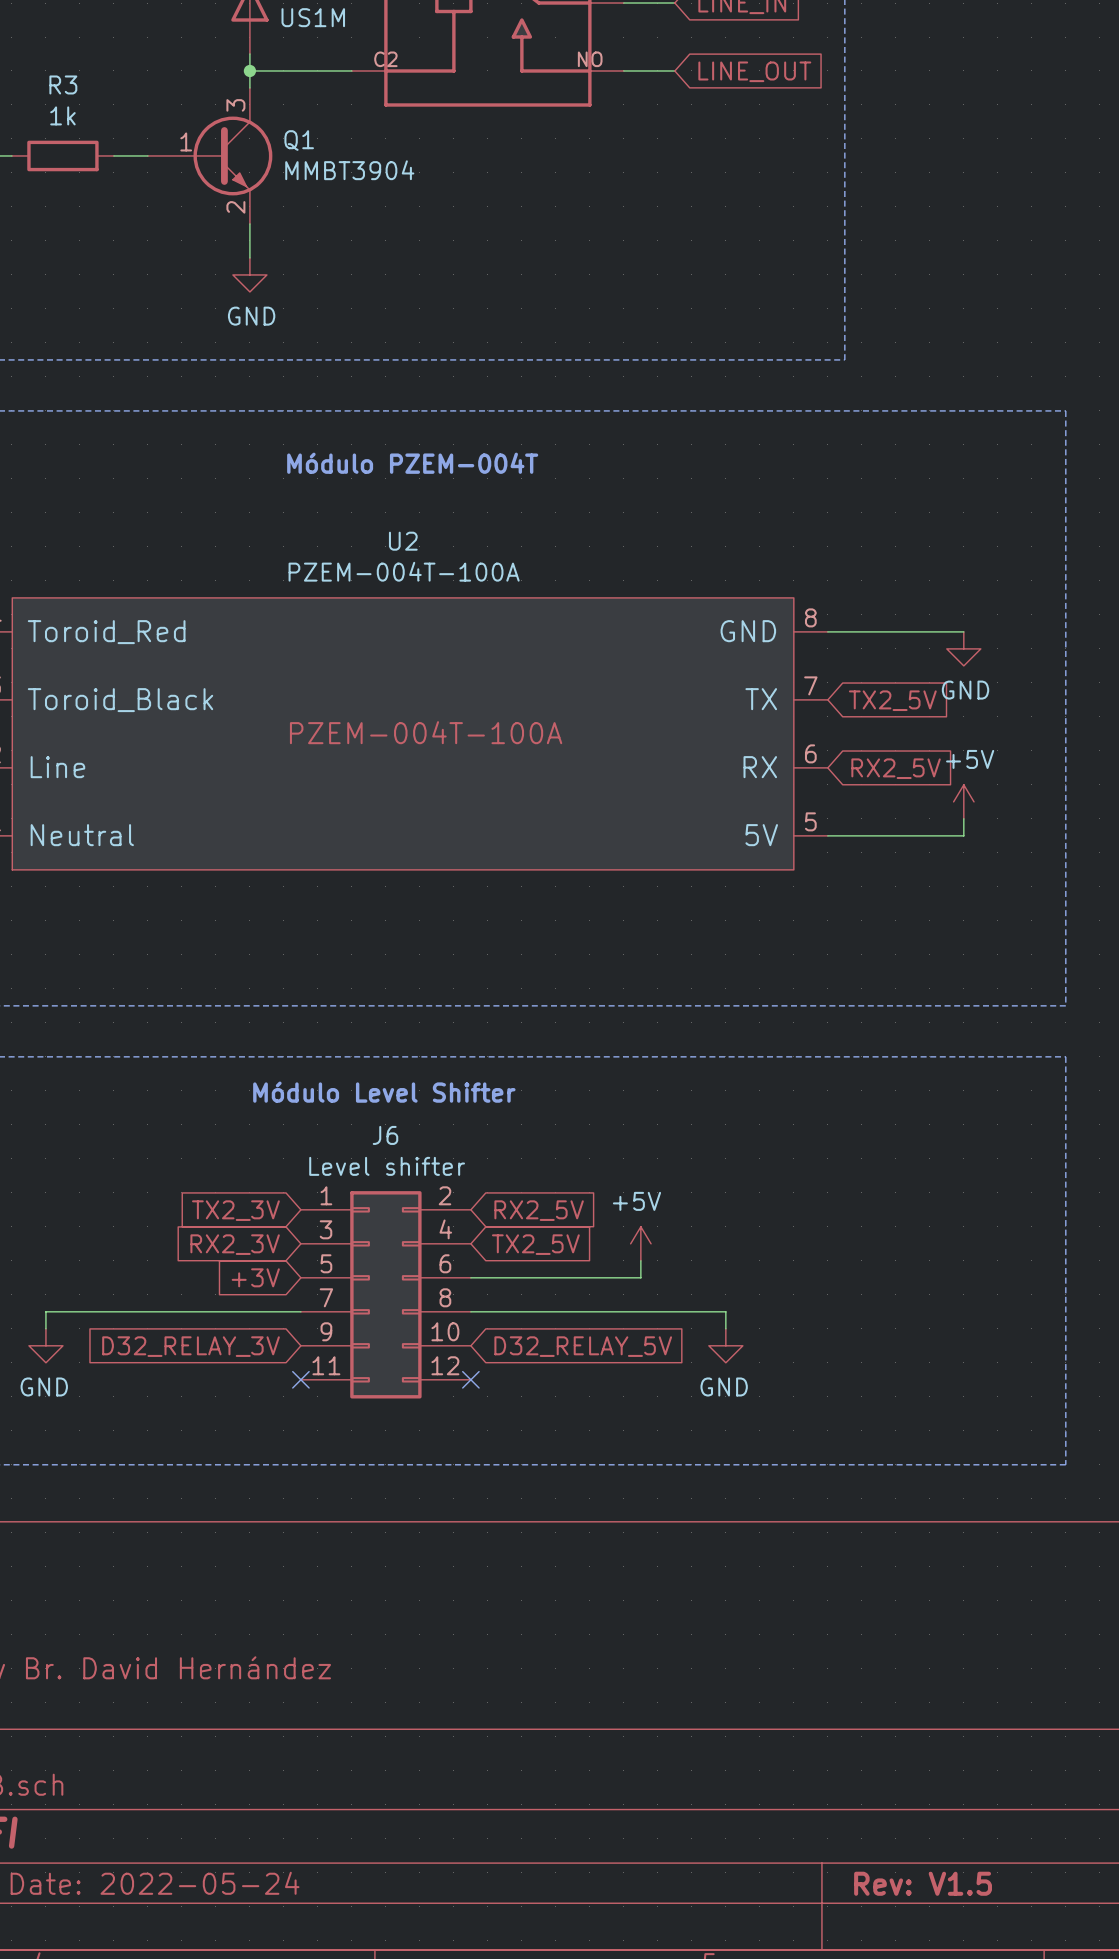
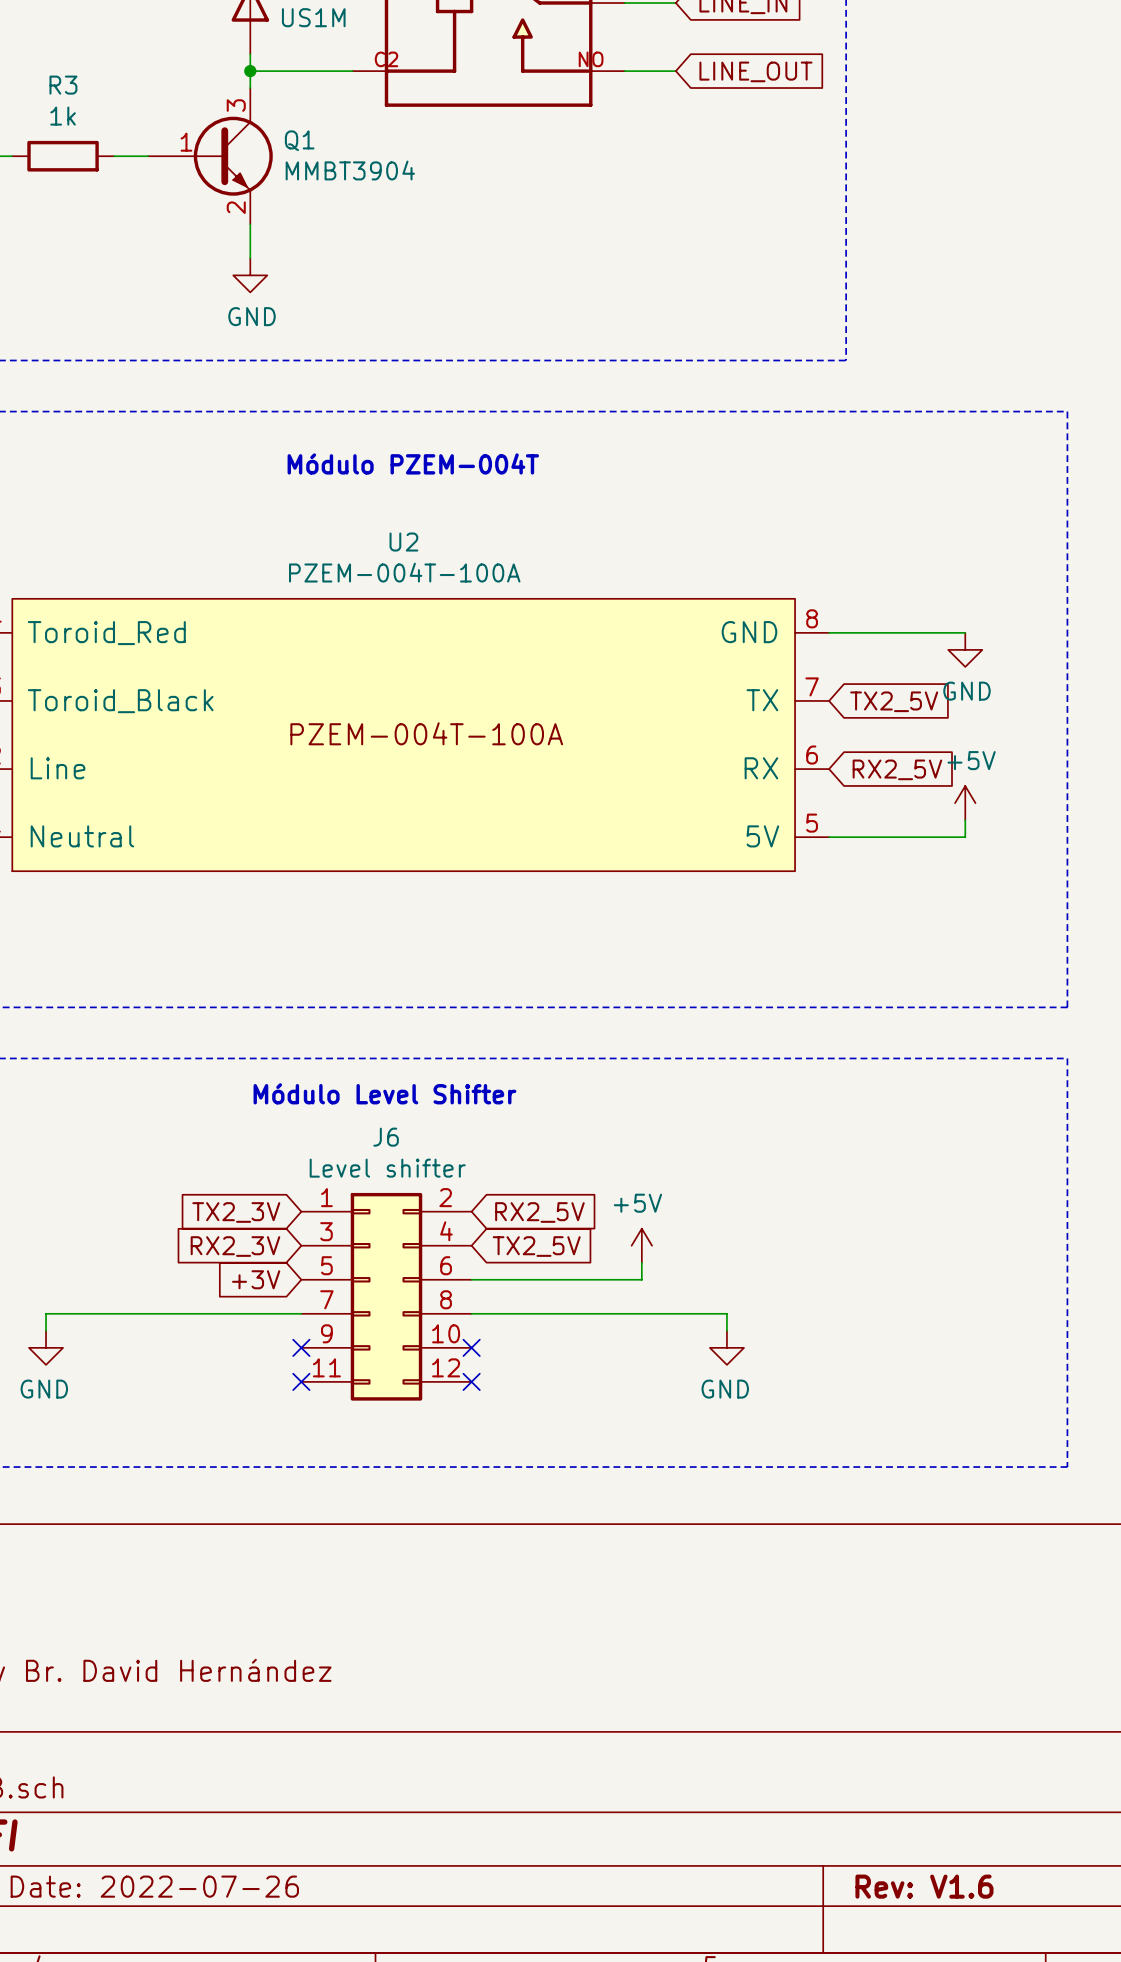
no-connect mark: none -> (301, 1347)
no-connect mark: none -> (471, 1347)
global label: D32_RELAY_3V (191, 1346) -> none
global label: D32_RELAY_5V (583, 1346) -> none
title block: Date: 2022-05-24 (155, 1883) -> Date: 2022-07-26 (154, 1886)
title block: Rev: V1.5 (923, 1883) -> Rev: V1.6 (924, 1886)

